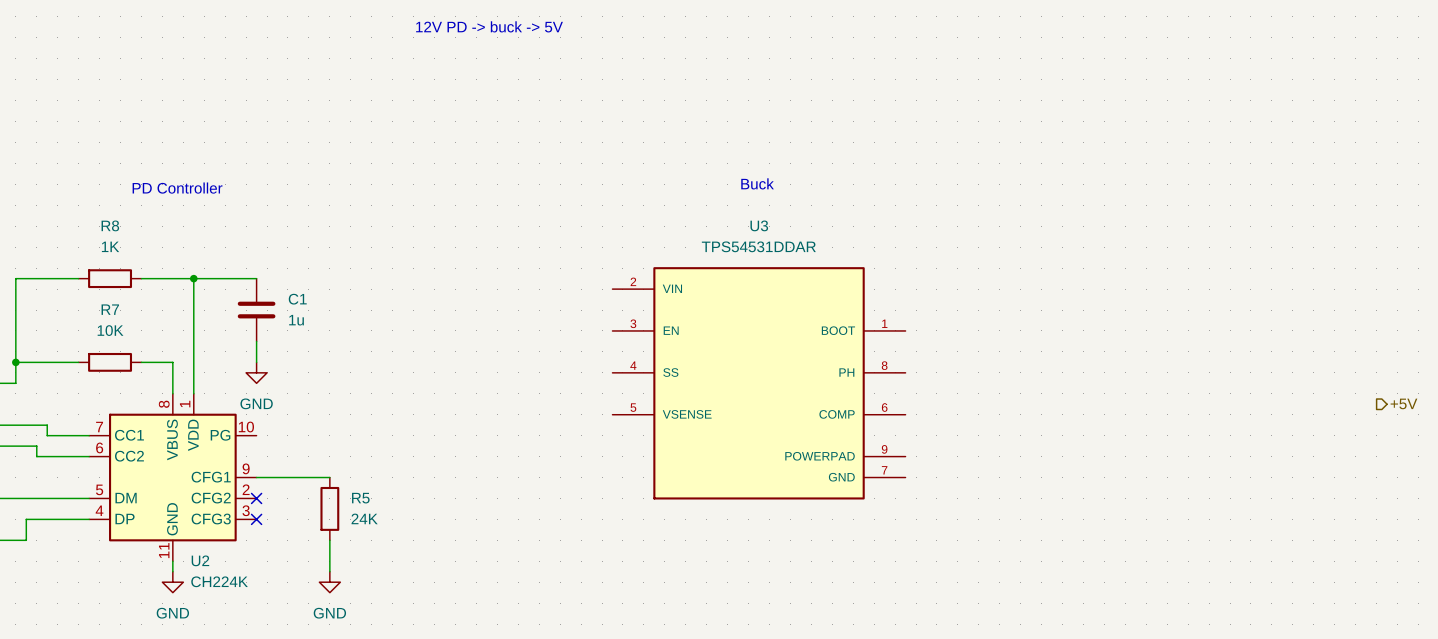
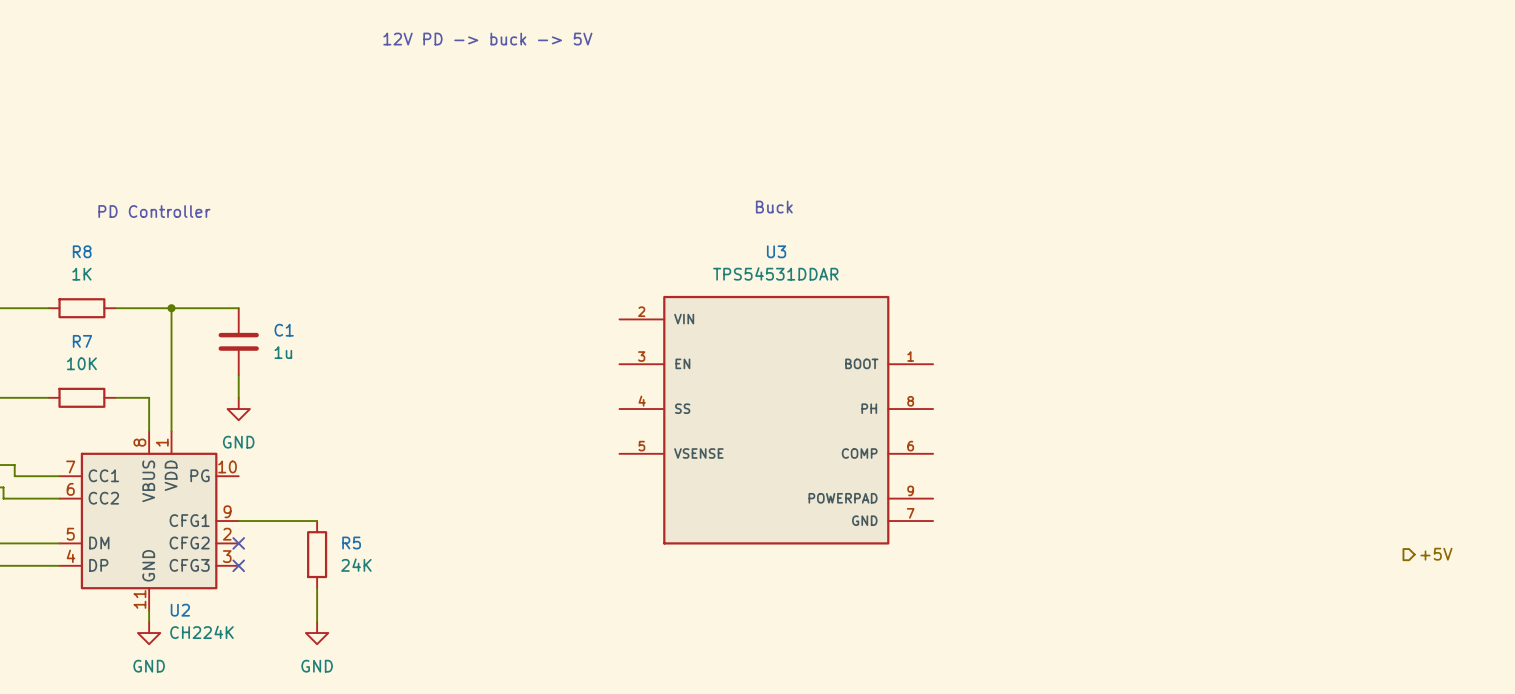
hierarchical label position: +5V (1403, 403) -> +5V (1436, 554)

